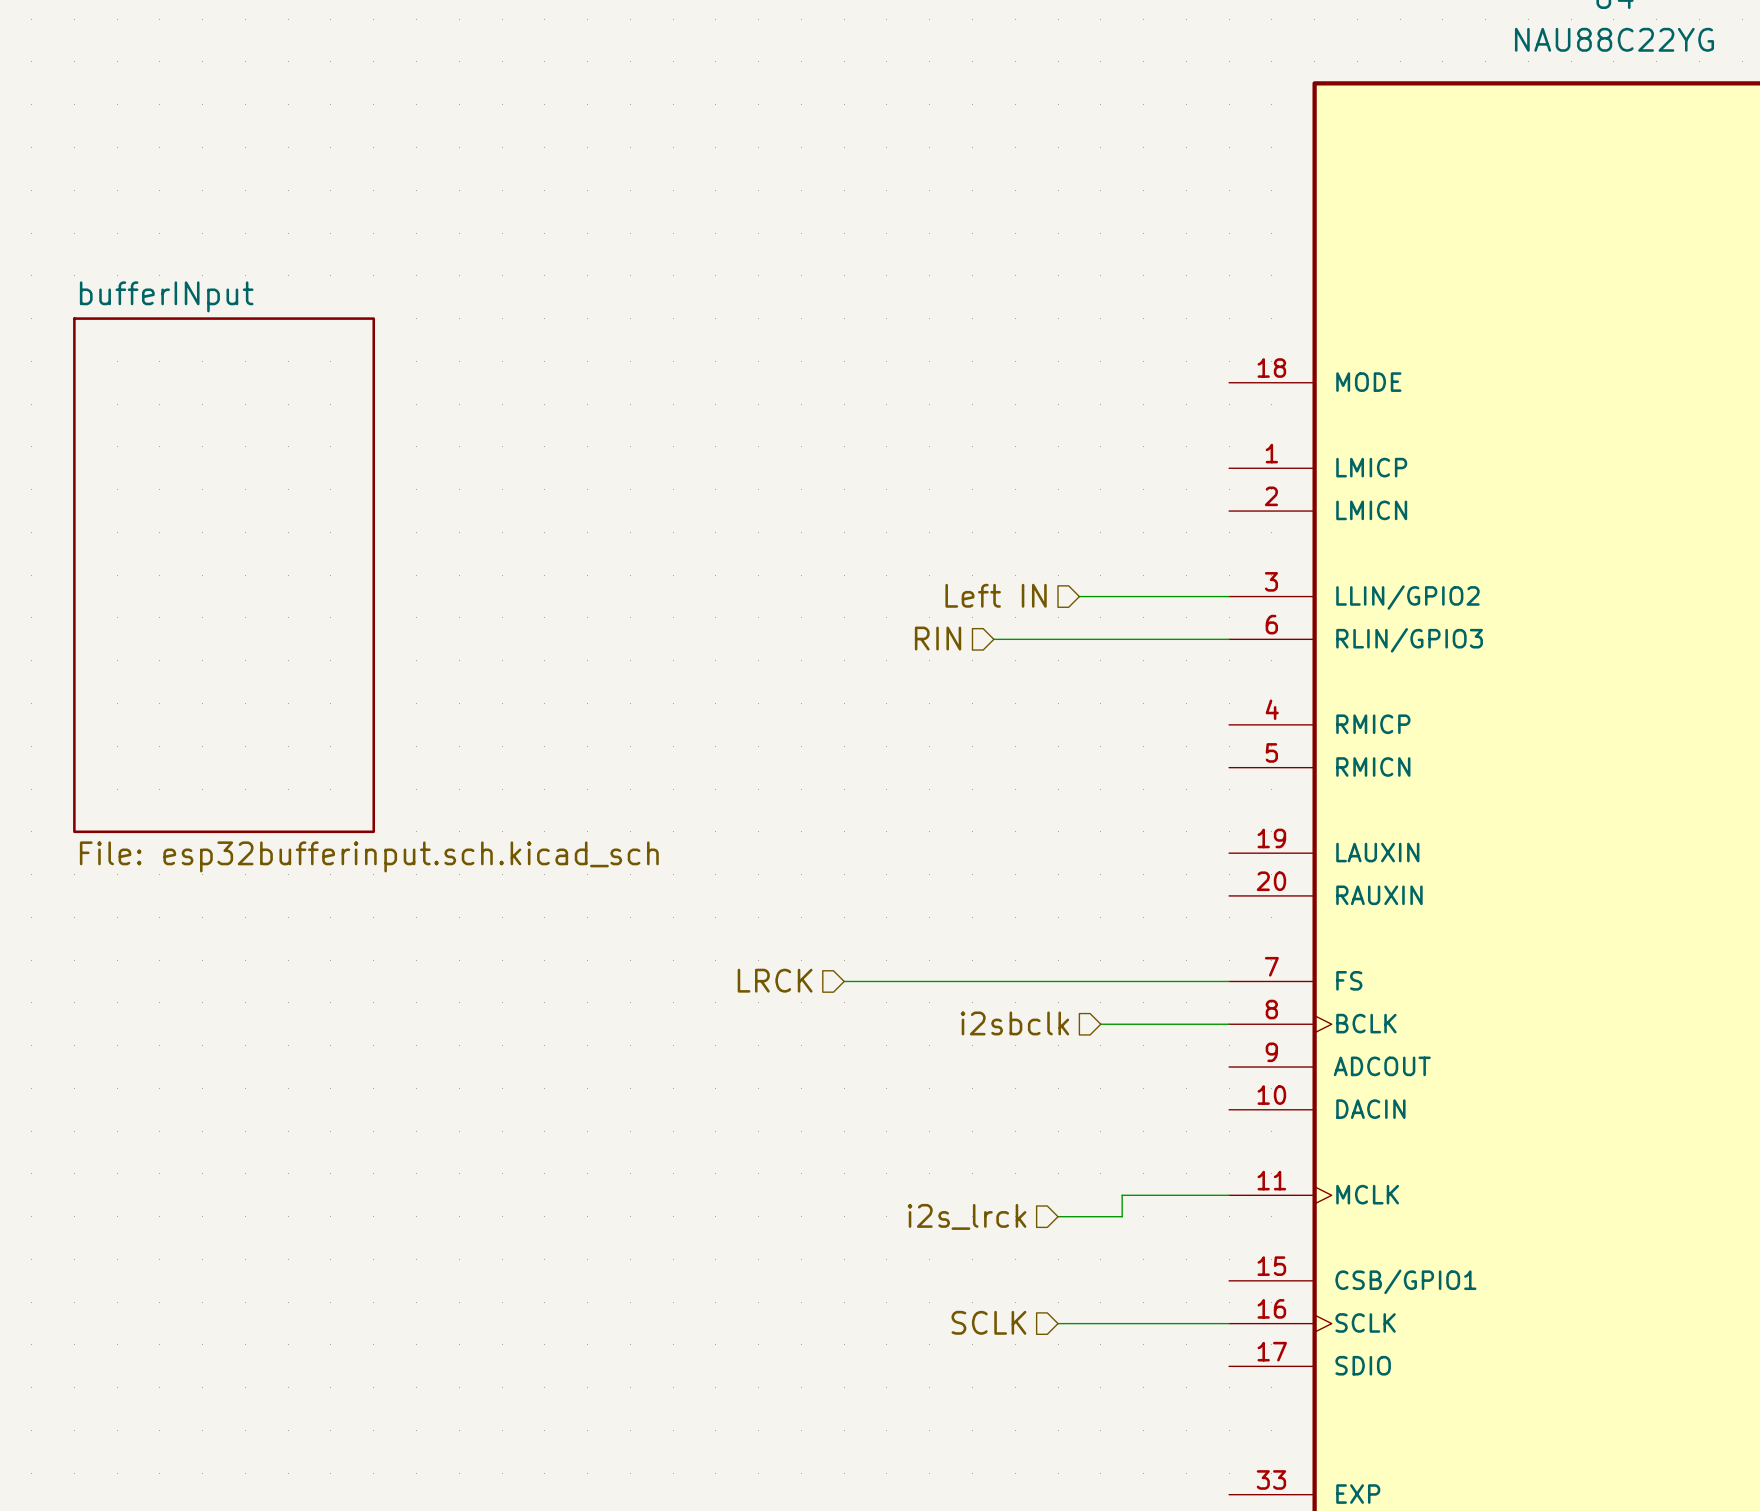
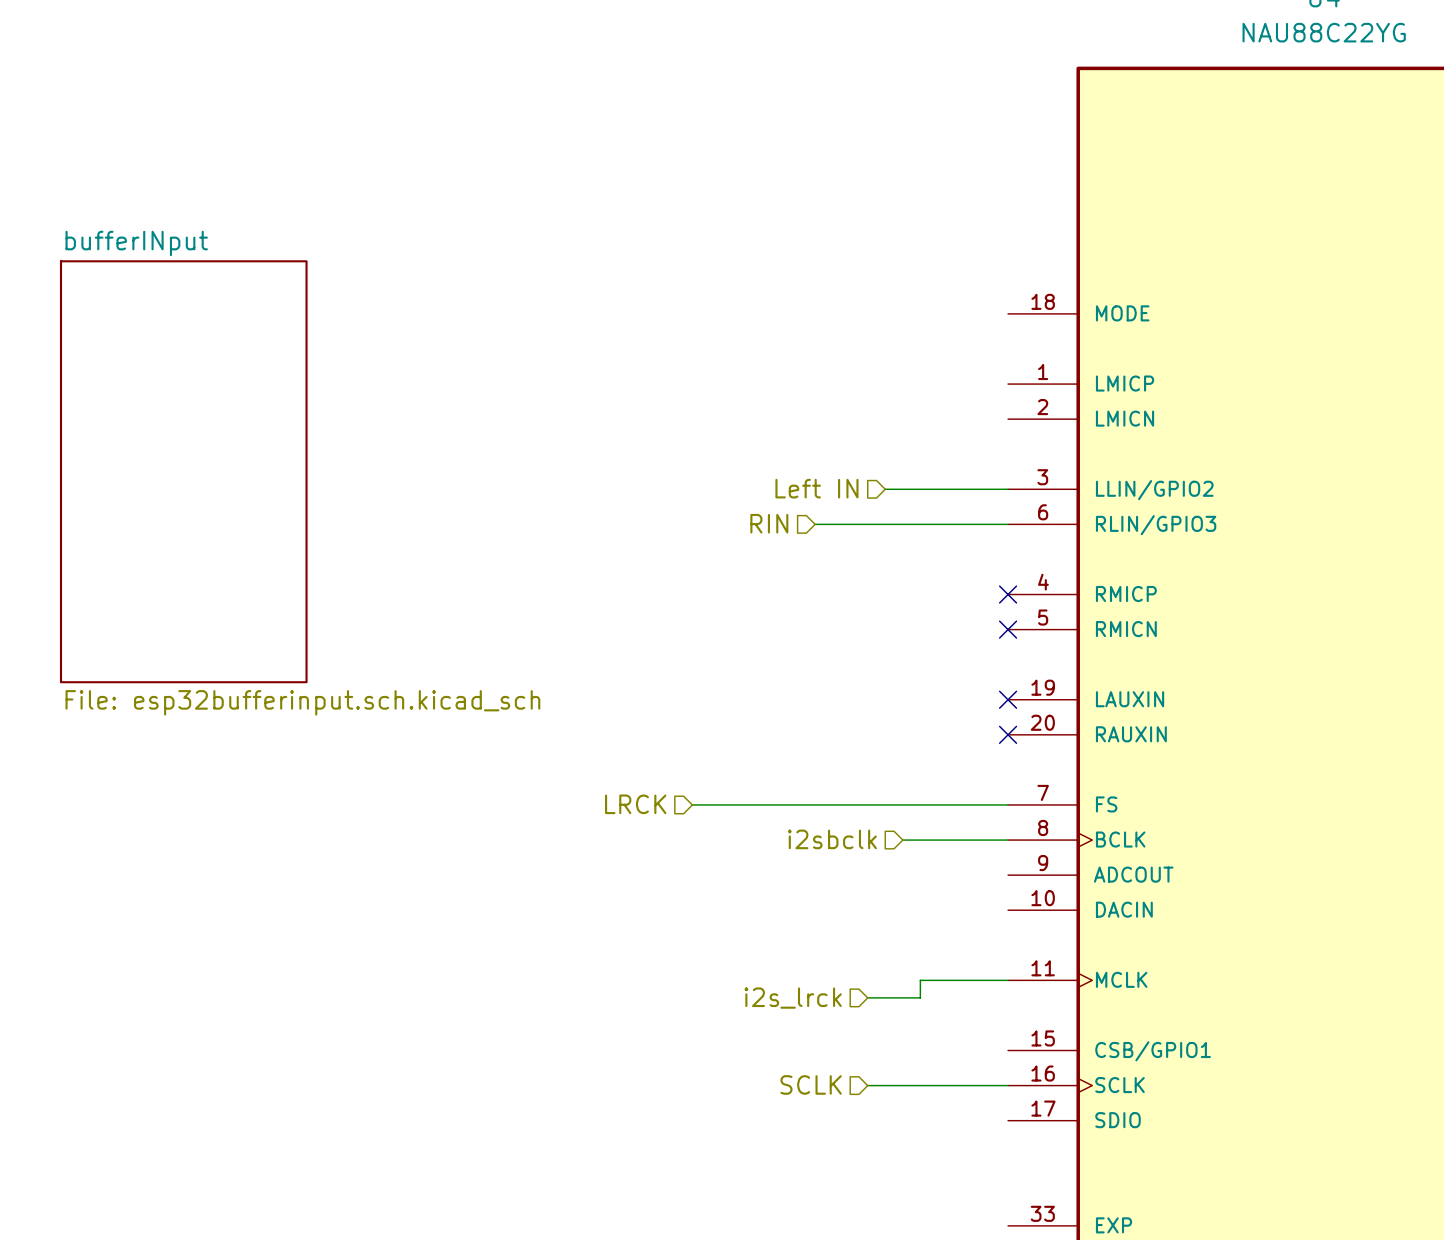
no-connect mark: none -> (1008, 594)
no-connect mark: none -> (1008, 629)
no-connect mark: none -> (1008, 699)
no-connect mark: none -> (1008, 734)

